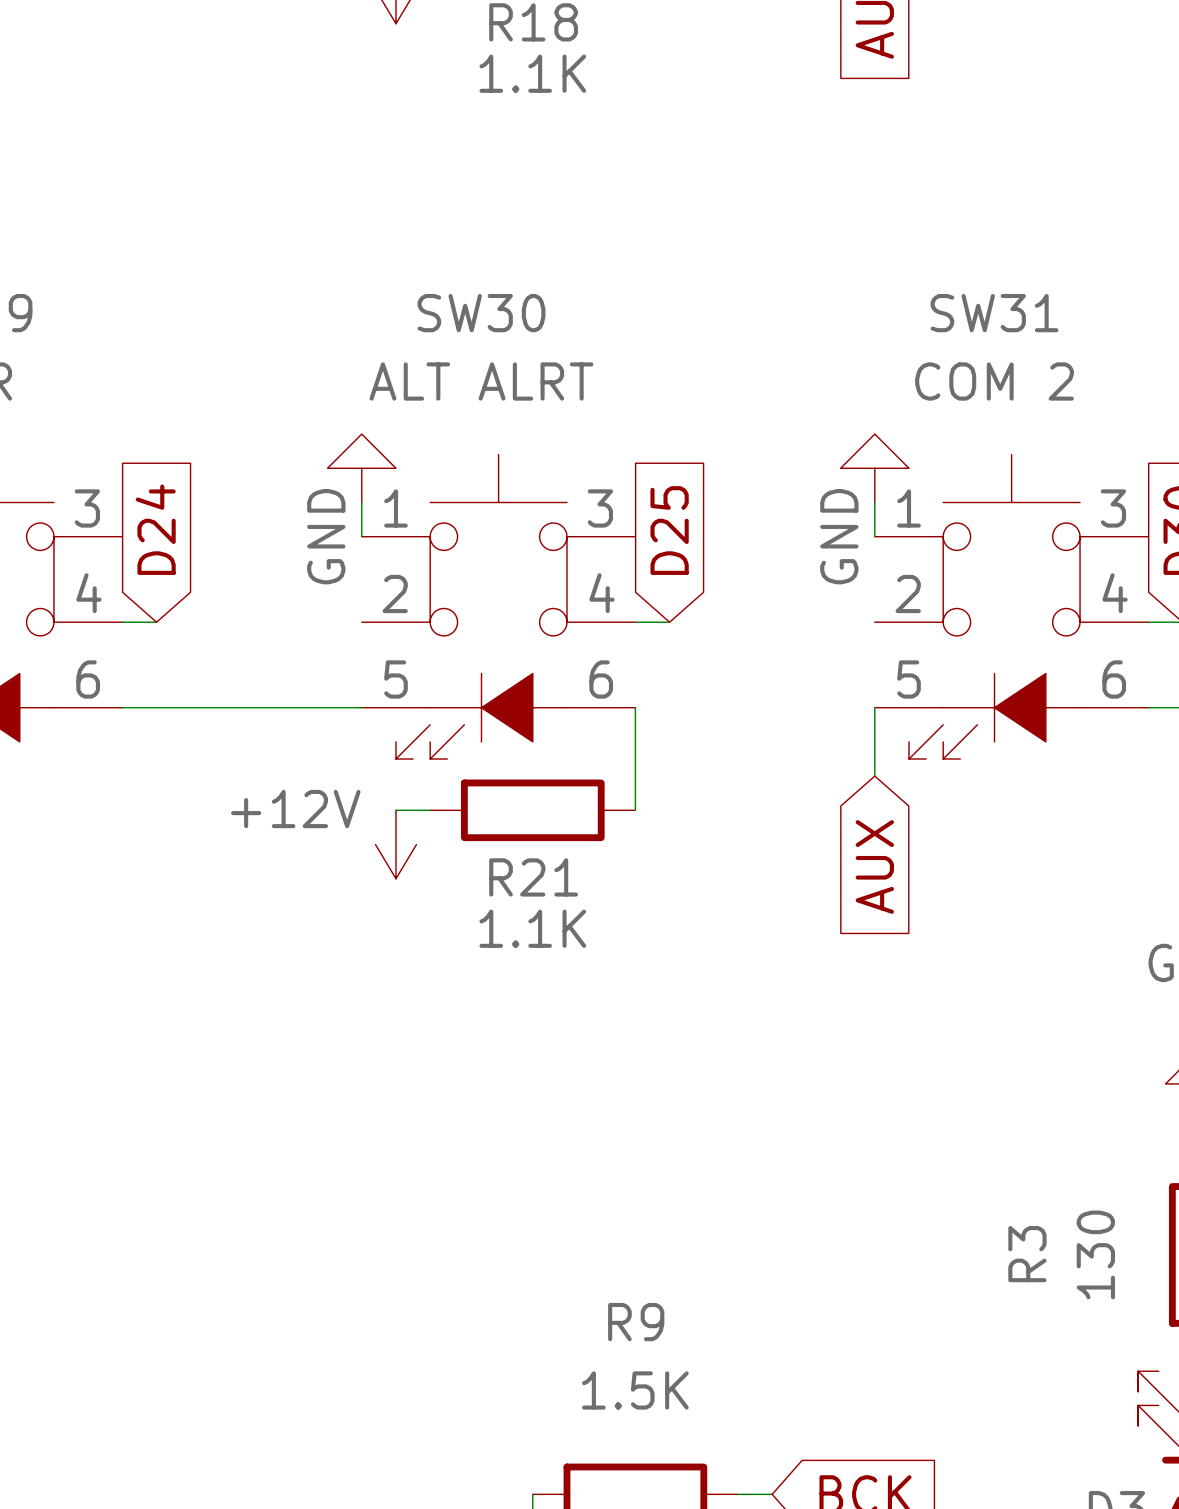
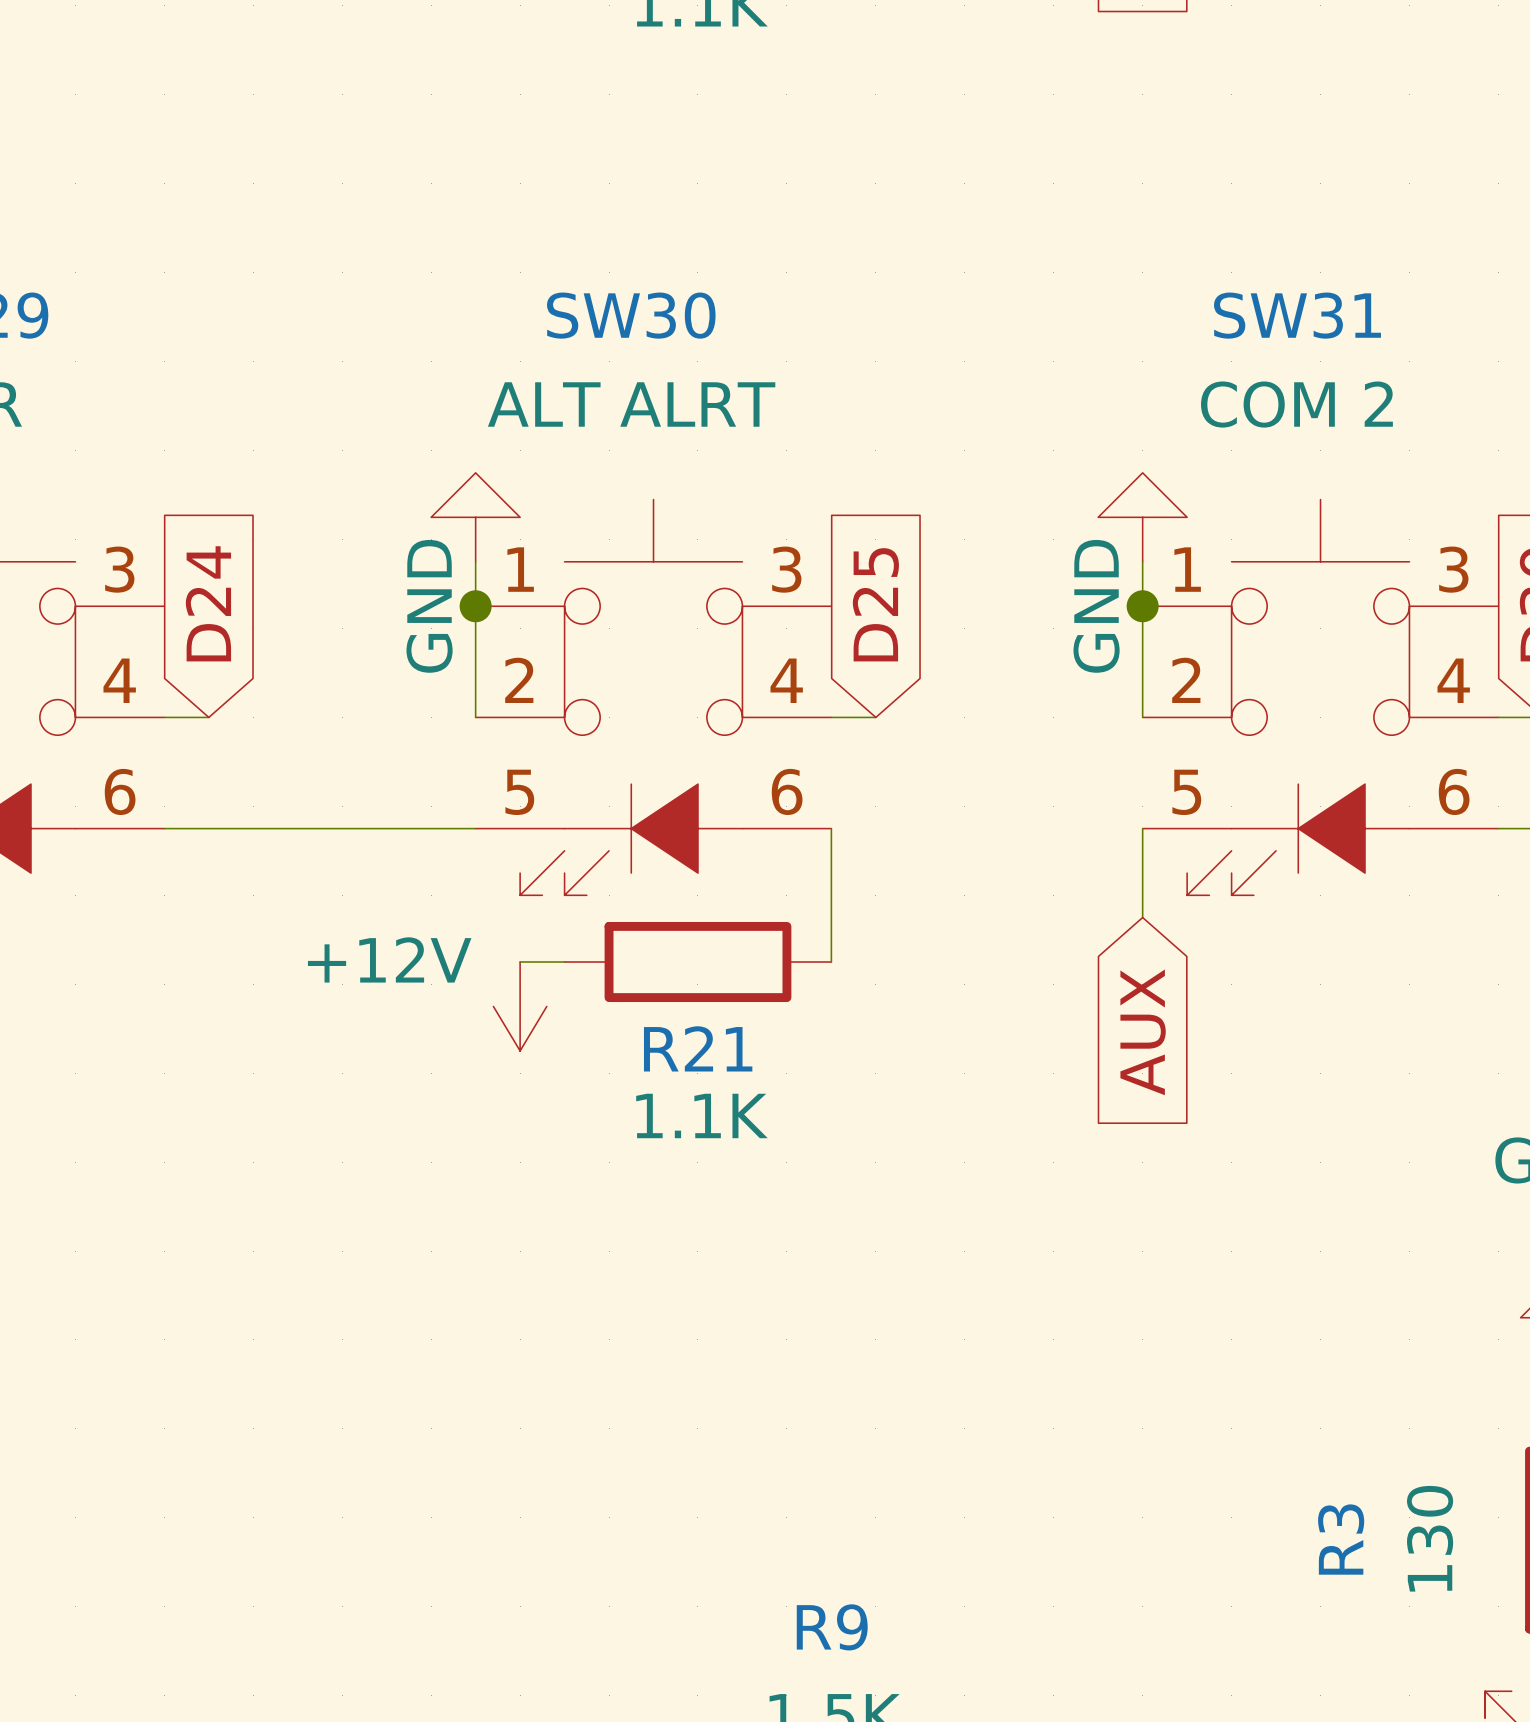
wire: none -> (475, 606) (475, 717)
junction: none -> (475, 606)
wire: none -> (1142, 606) (1142, 717)
junction: none -> (1142, 606)

